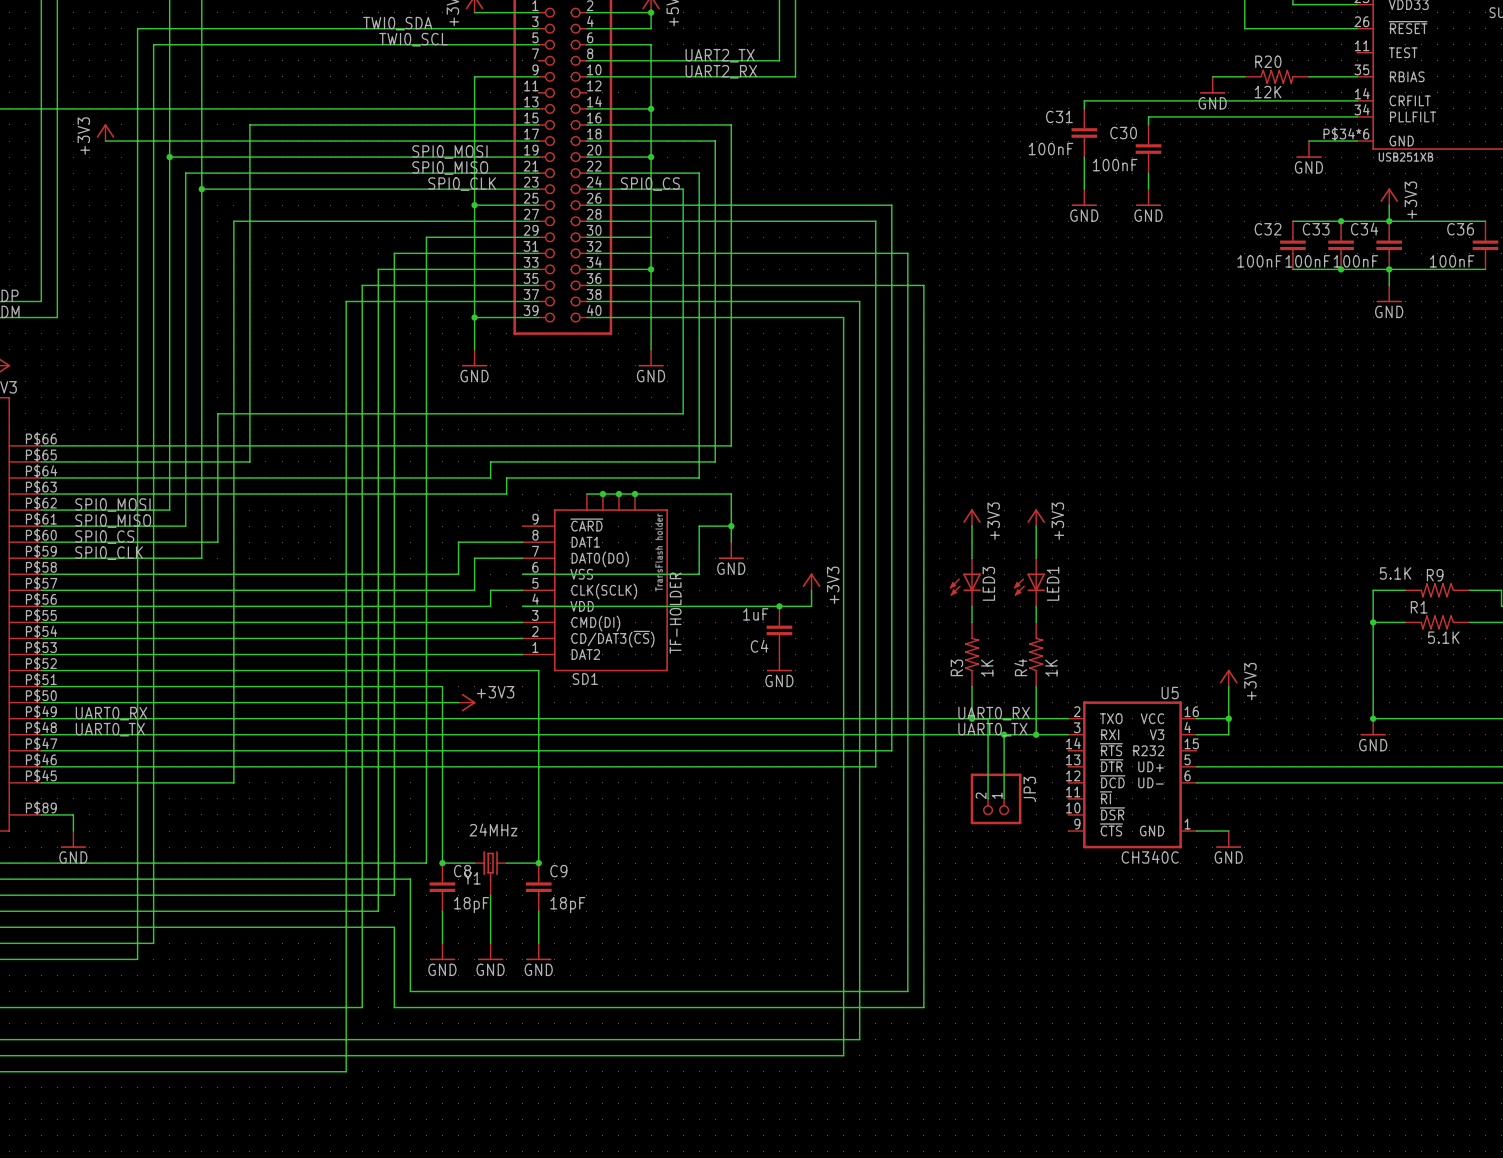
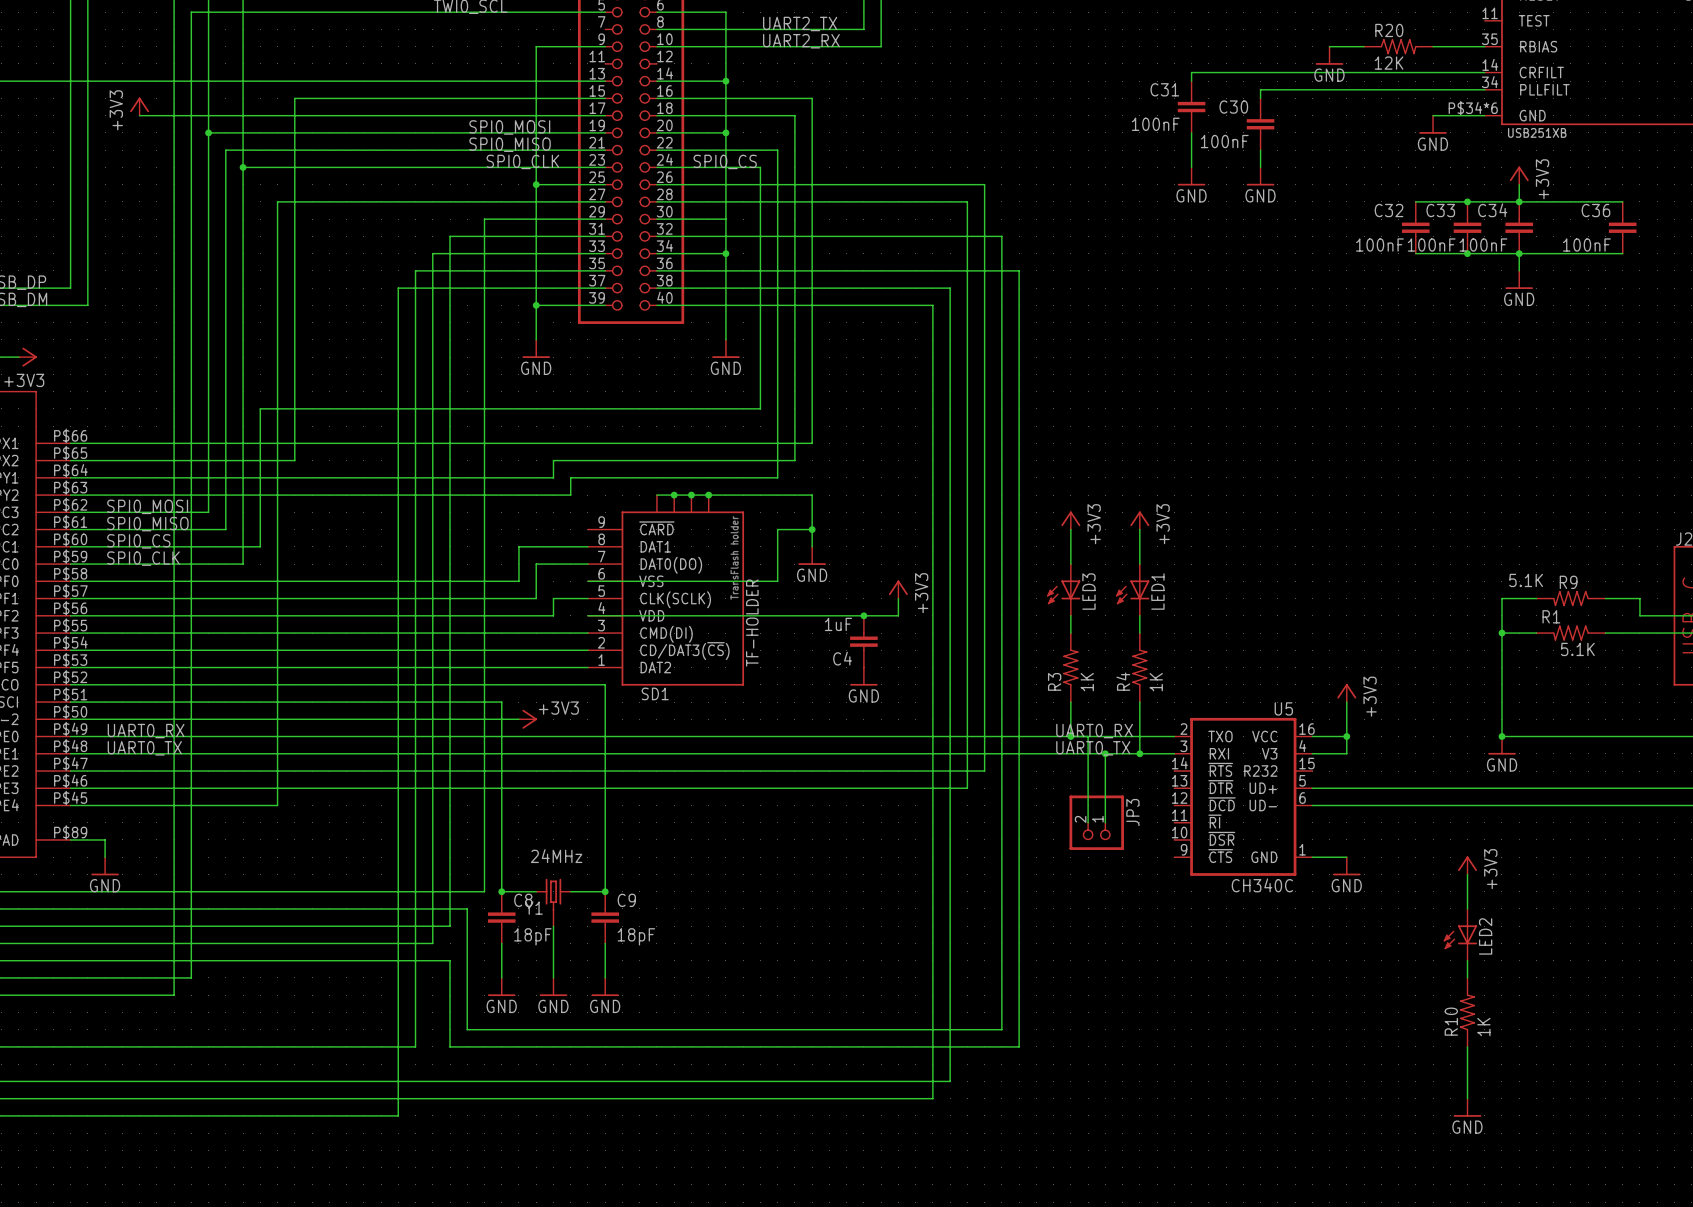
power symbol: none -> +3V3 (1467, 865)
wire: none -> (1467, 874) (1467, 908)
LED2: none -> (1460, 934)
wire: none -> (1467, 960) (1467, 977)
R10: none -> 1K (1467, 1012)
wire: none -> (1467, 1046) (1467, 1098)
power symbol: none -> GND (1467, 1107)

